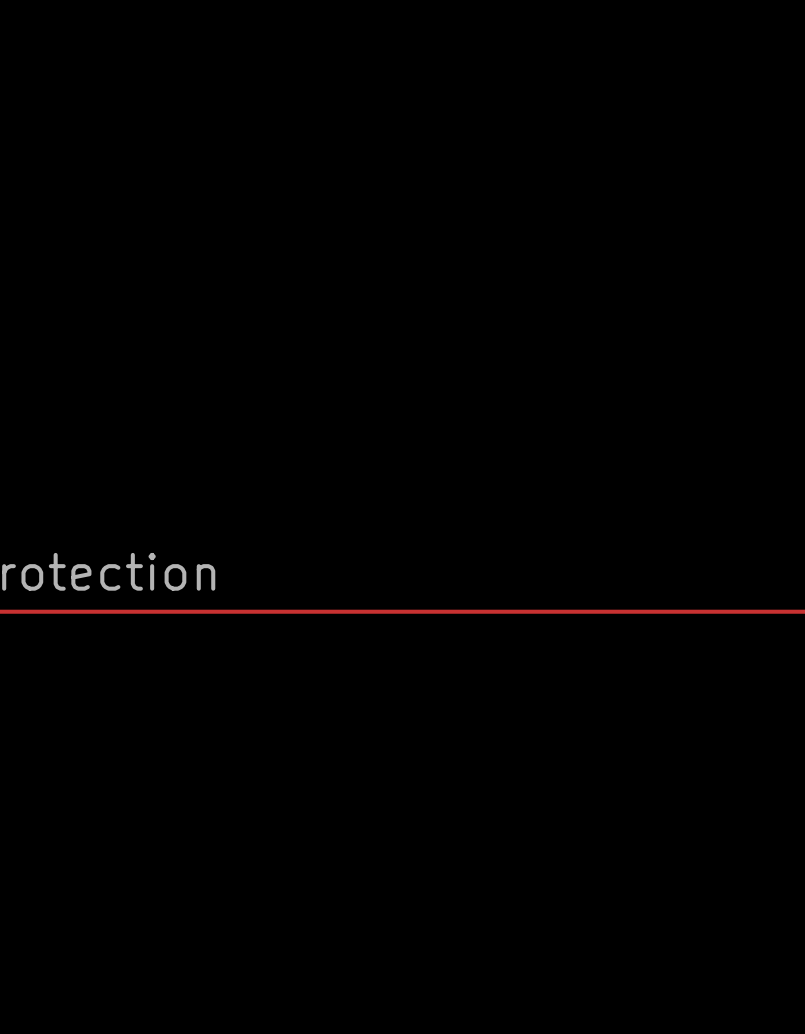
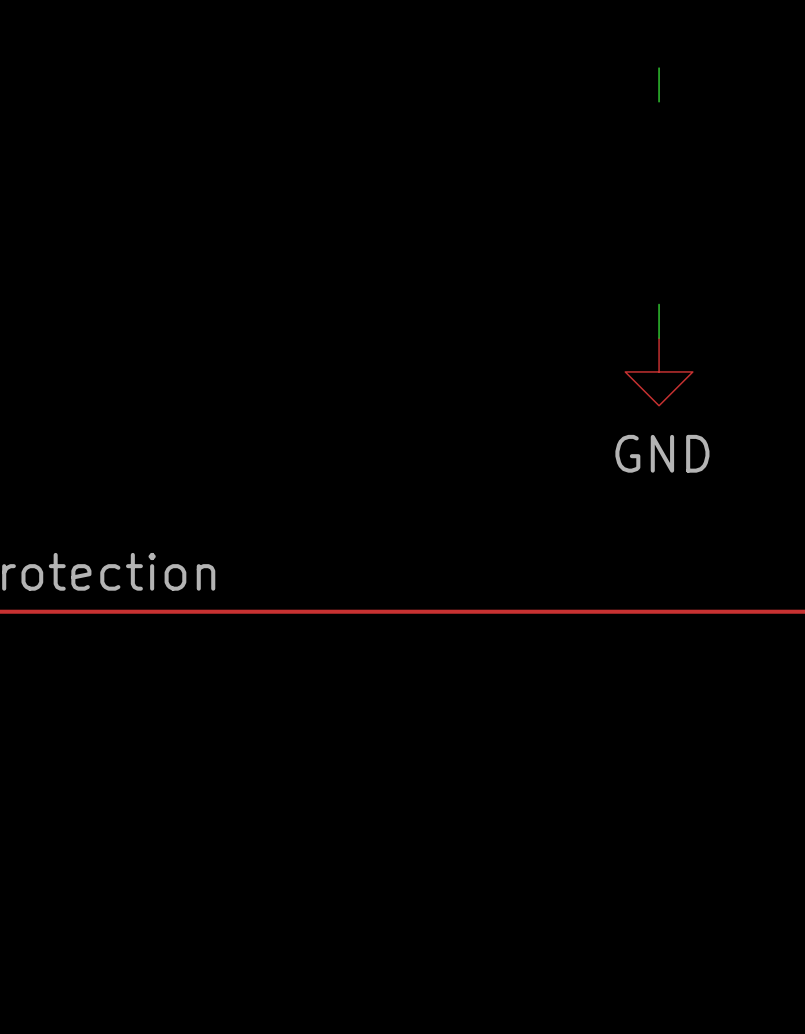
wire: none -> (659, 68) (659, 101)
wire: none -> (659, 304) (659, 338)
power symbol: none -> GND (659, 371)

